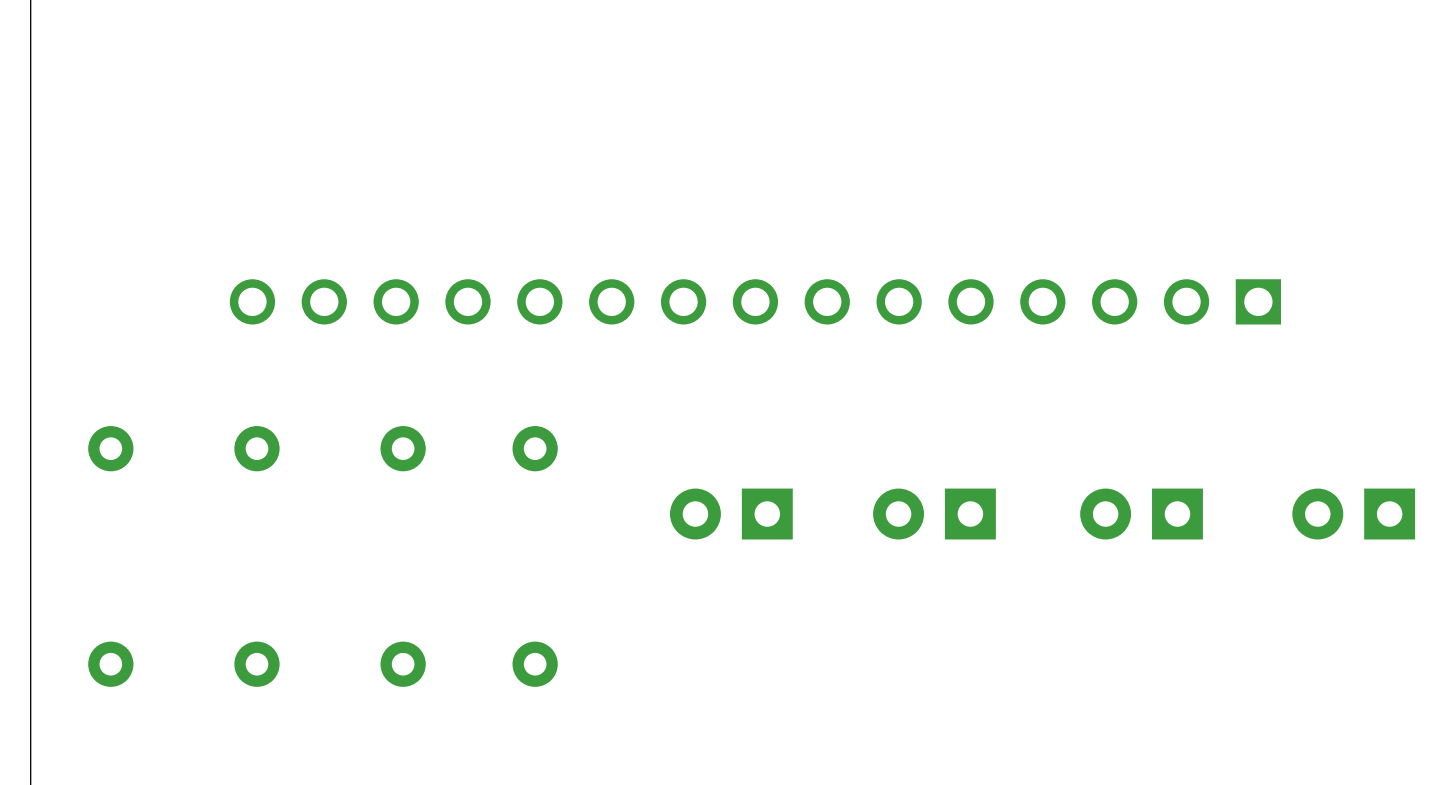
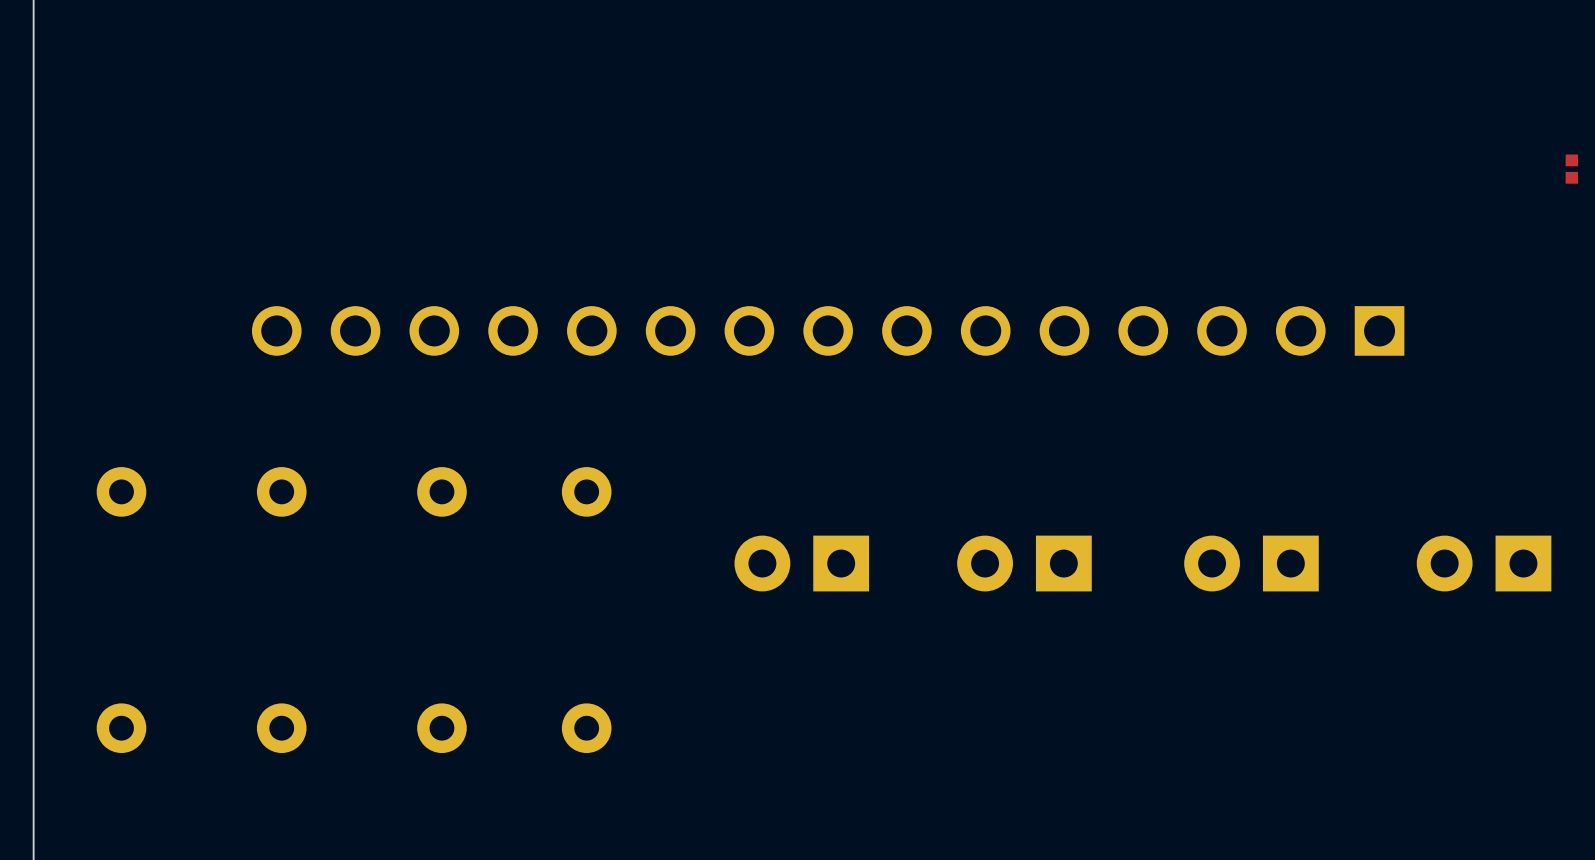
part: none -> (1571, 169)

